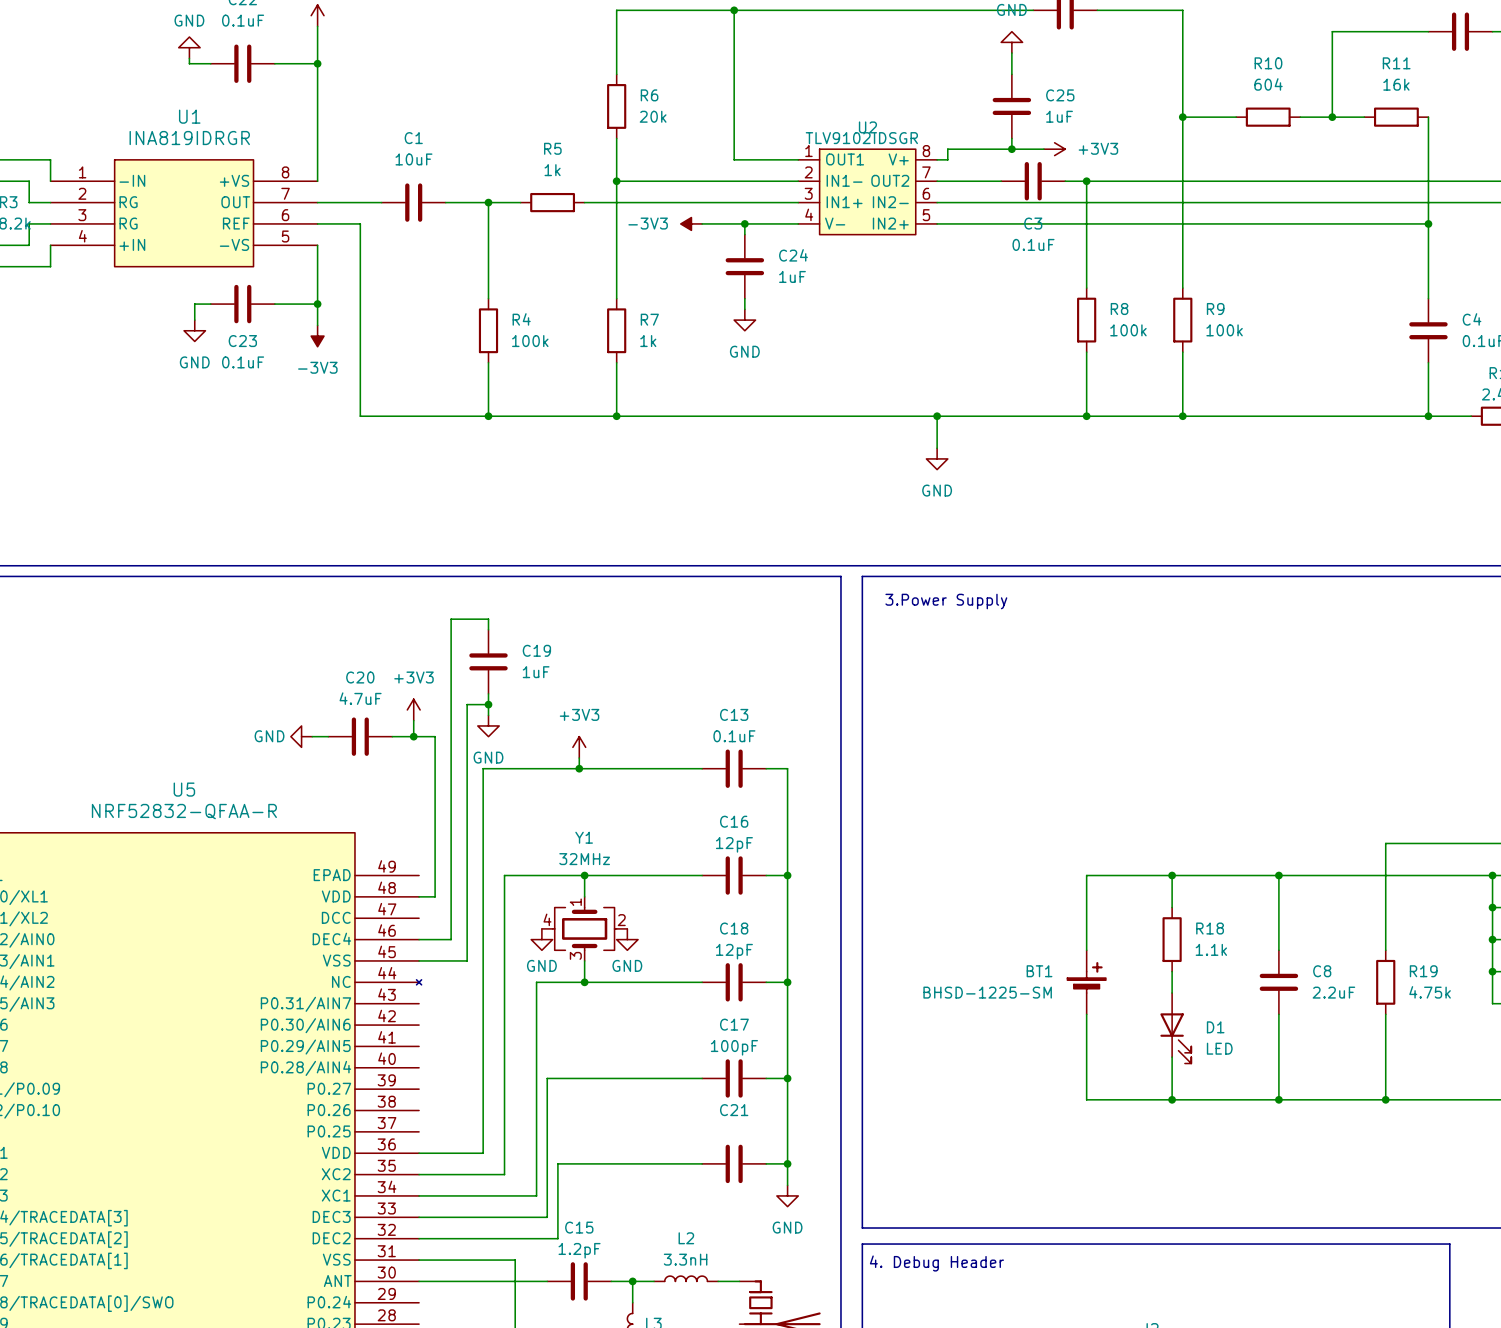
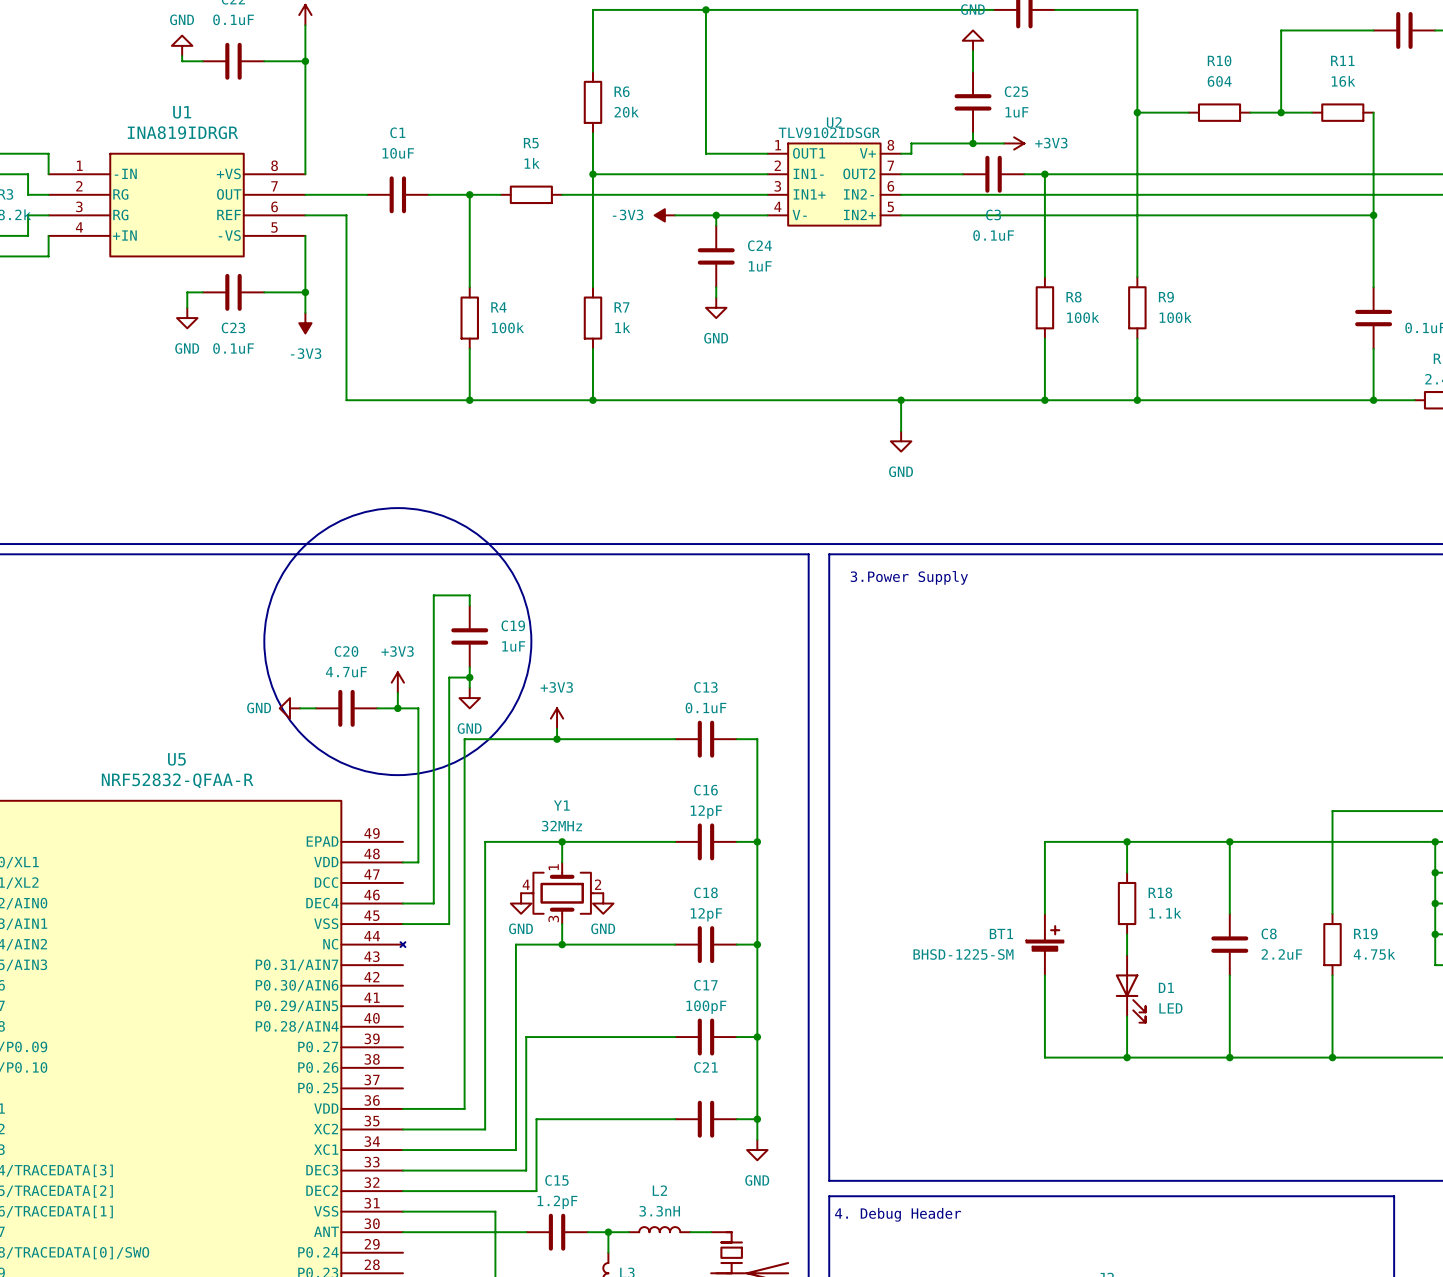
C4 name: C4 (1472, 319) -> none
drawing: none -> [264, 508, 532, 776]

